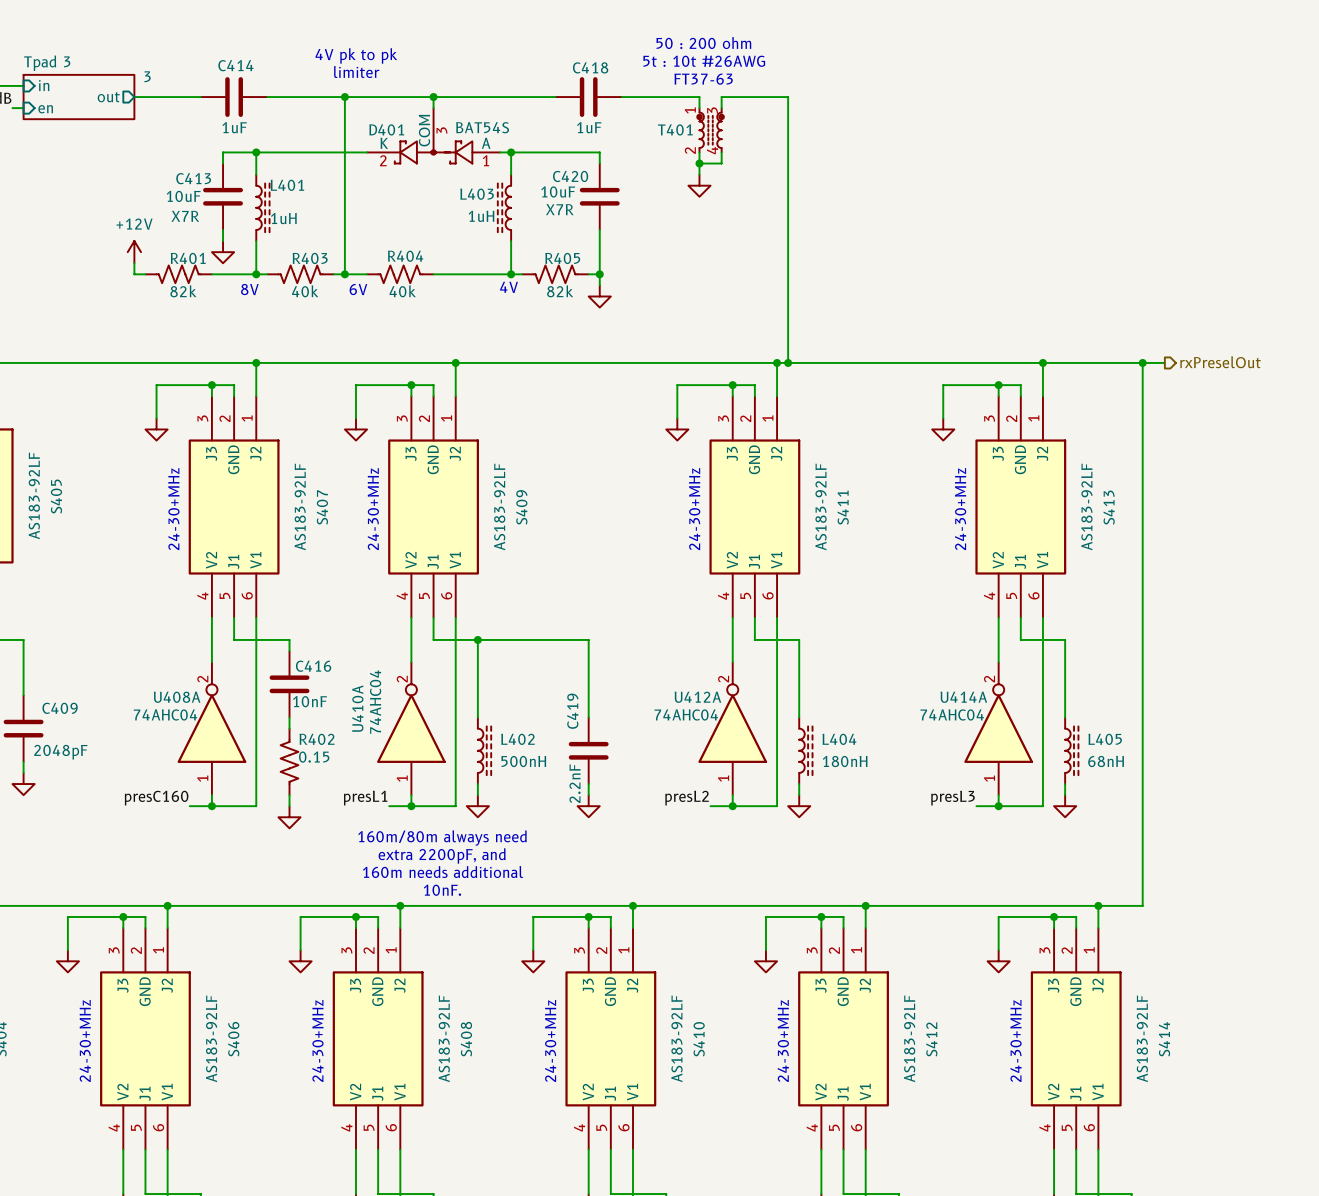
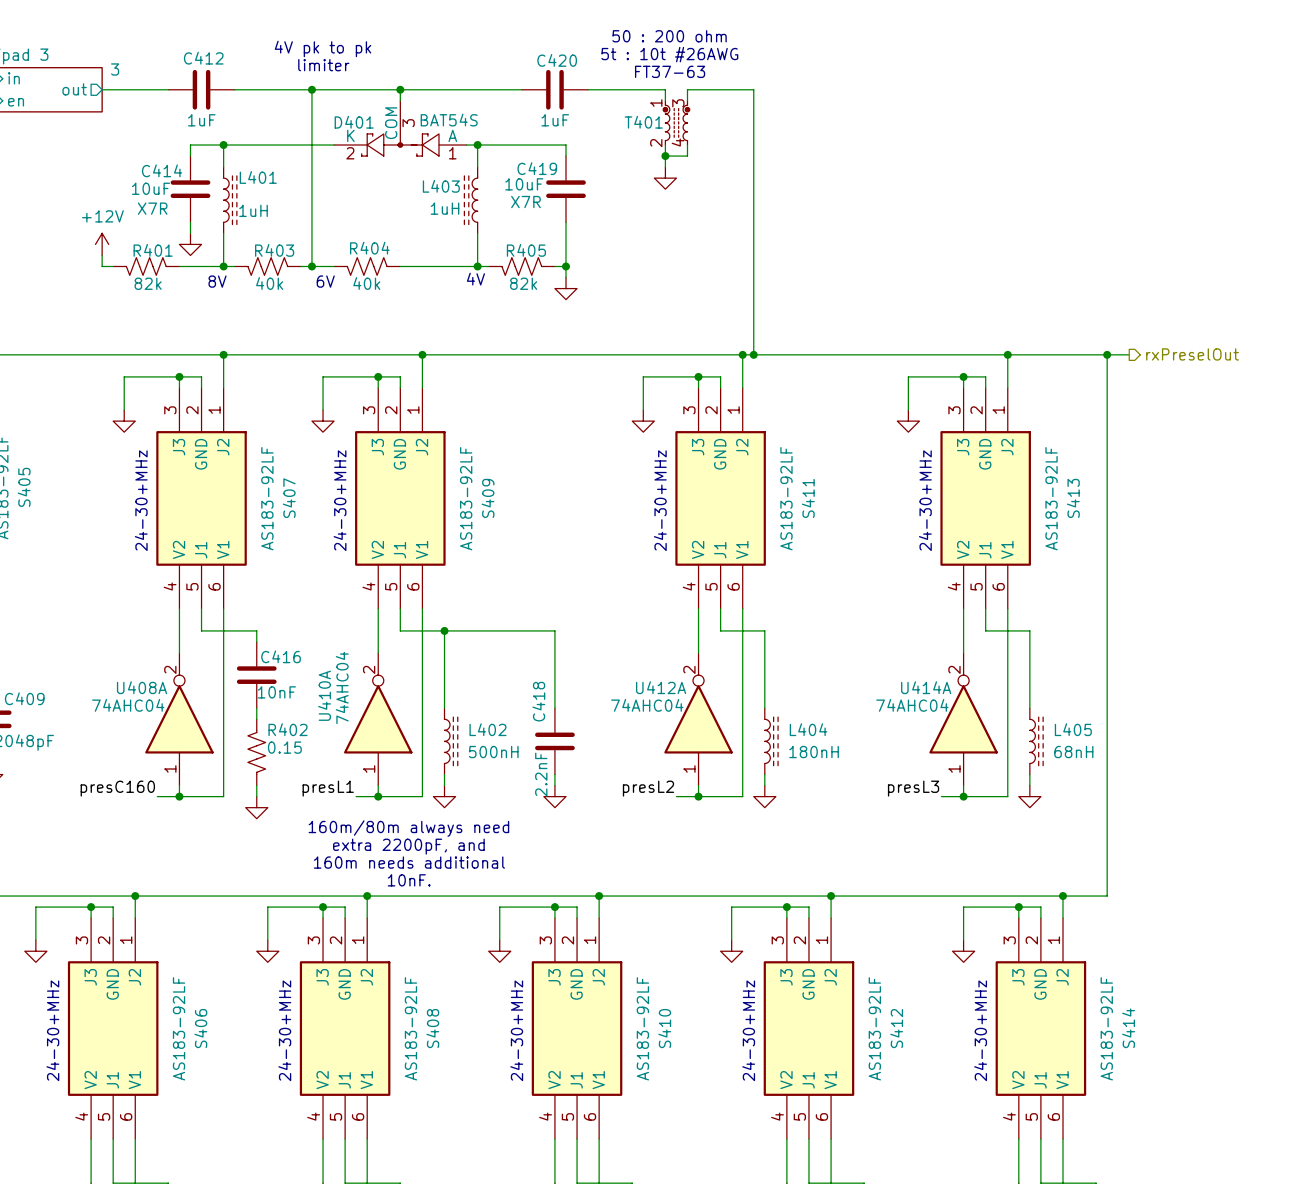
C414 name: C414 (235, 65) -> C412 (203, 58)
C418 name: C418 (590, 67) -> C420 (557, 60)
C420 name: C420 (570, 176) -> C419 (537, 168)
C413 name: C413 (193, 178) -> C414 (162, 170)
C419 name: C419 (572, 711) -> C418 (538, 701)

